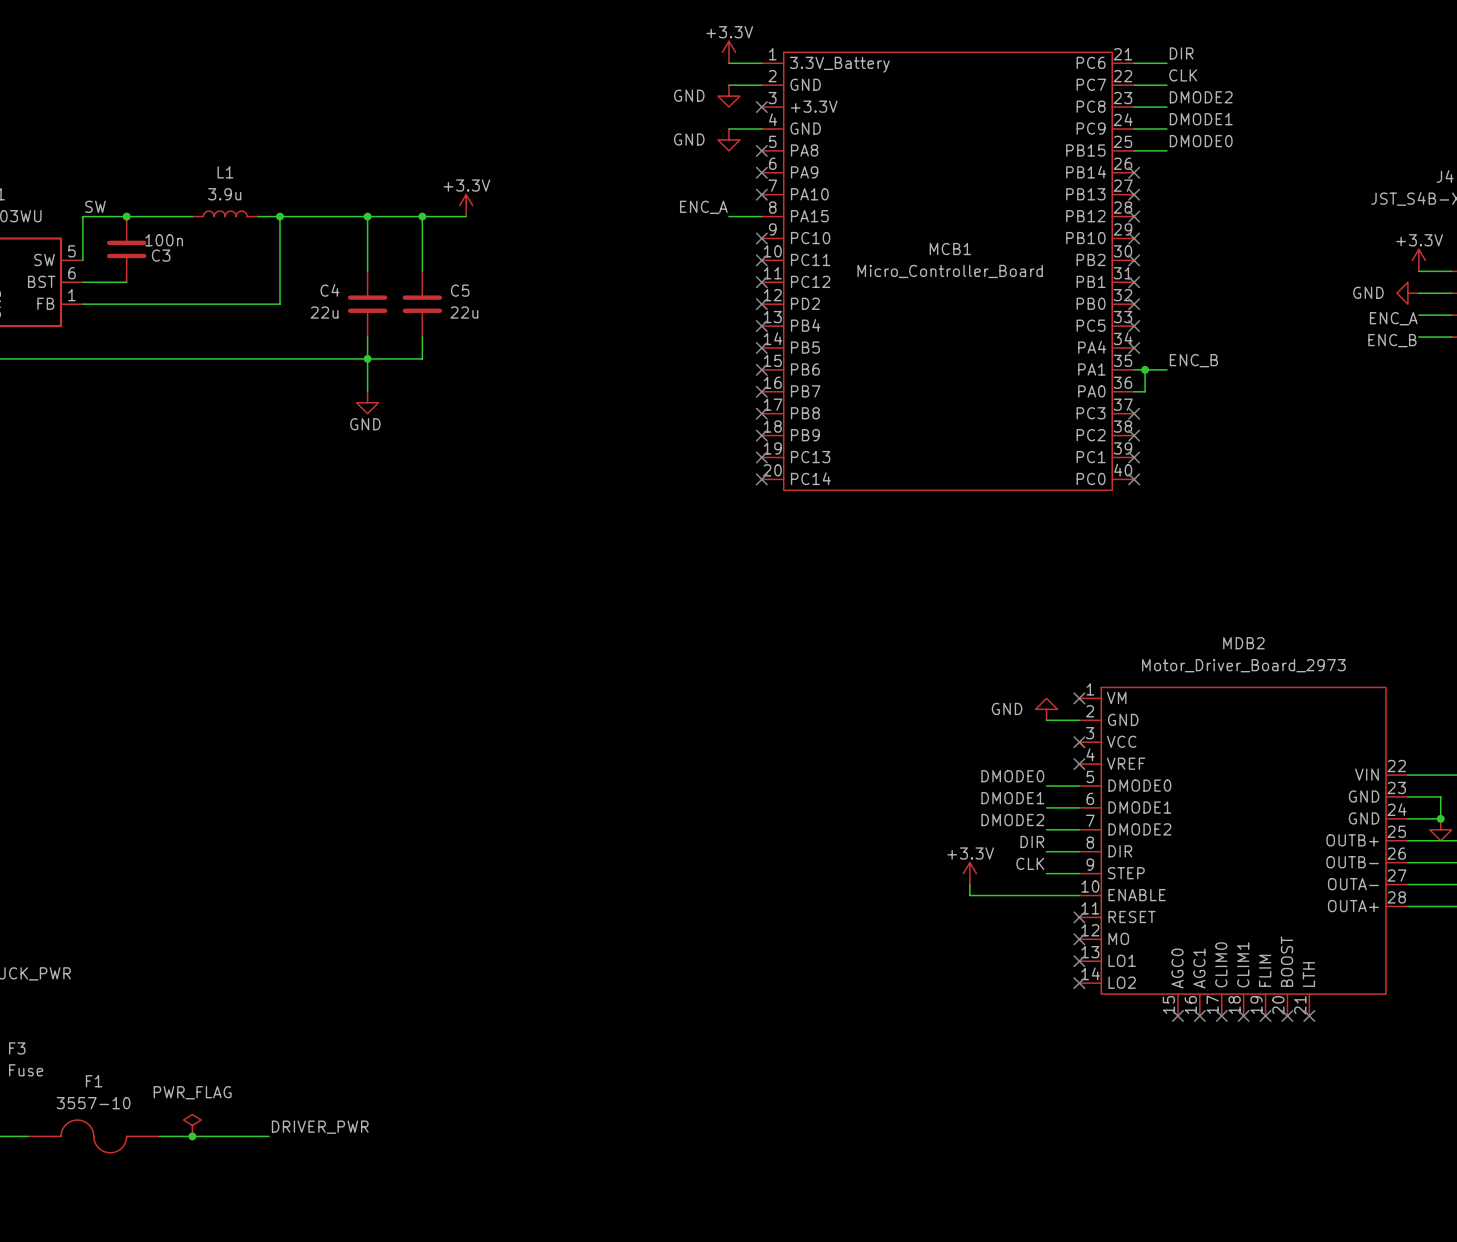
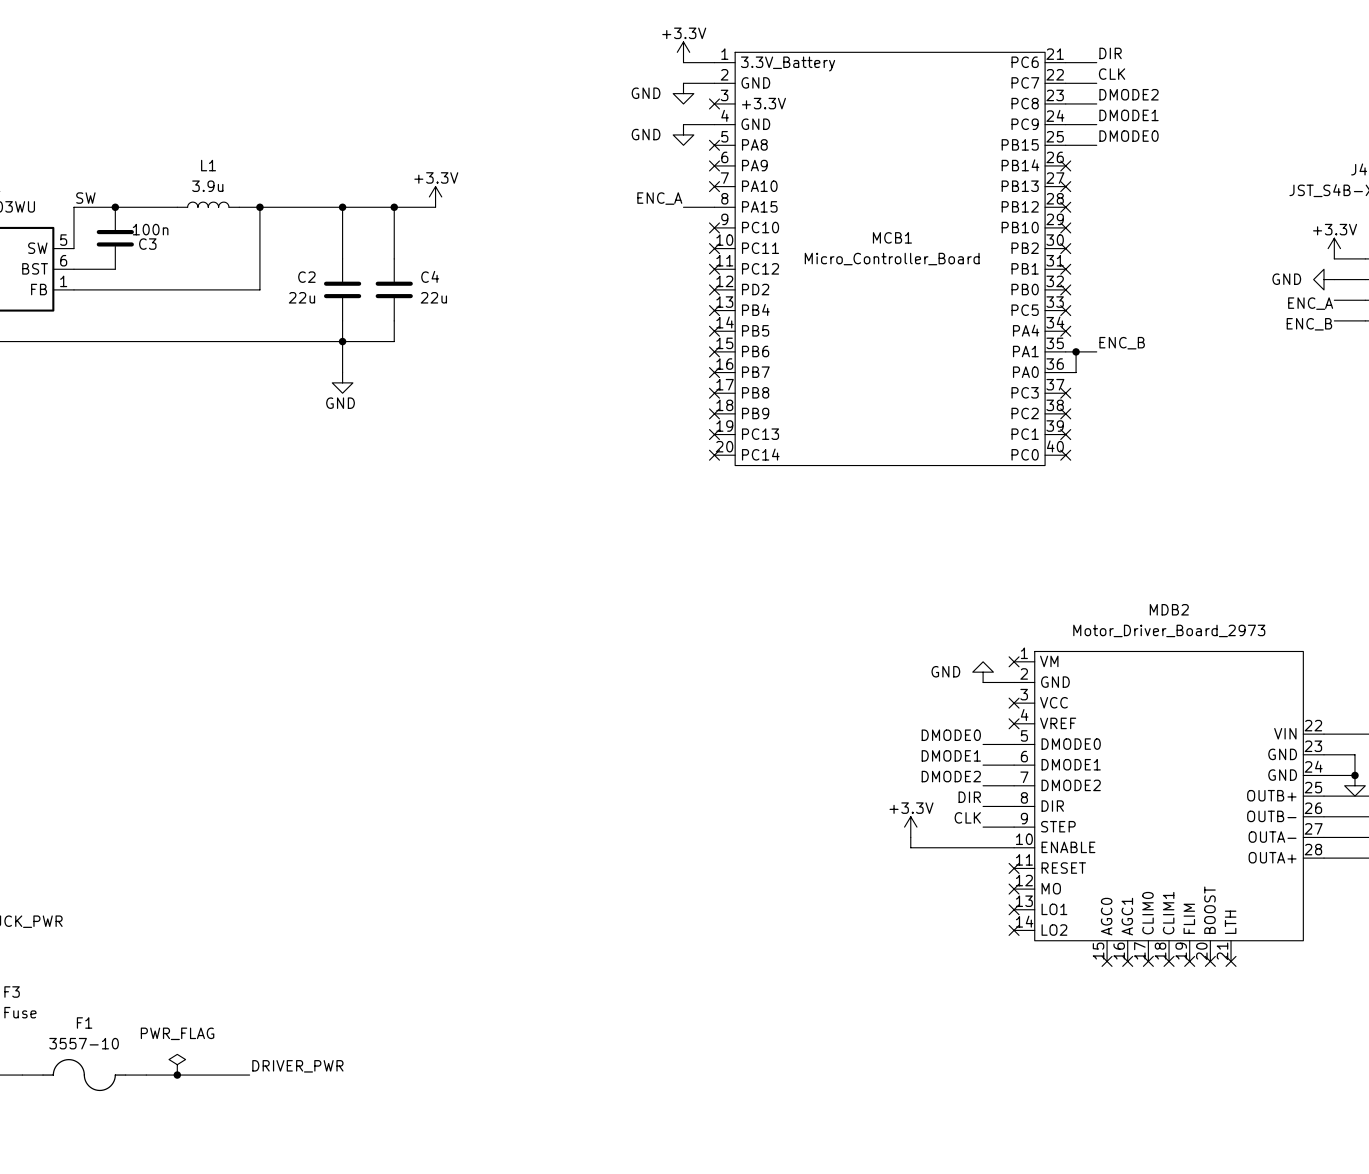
C4 name: C4 (330, 290) -> C2 (306, 277)
C5 name: C5 (460, 290) -> C4 (430, 276)

